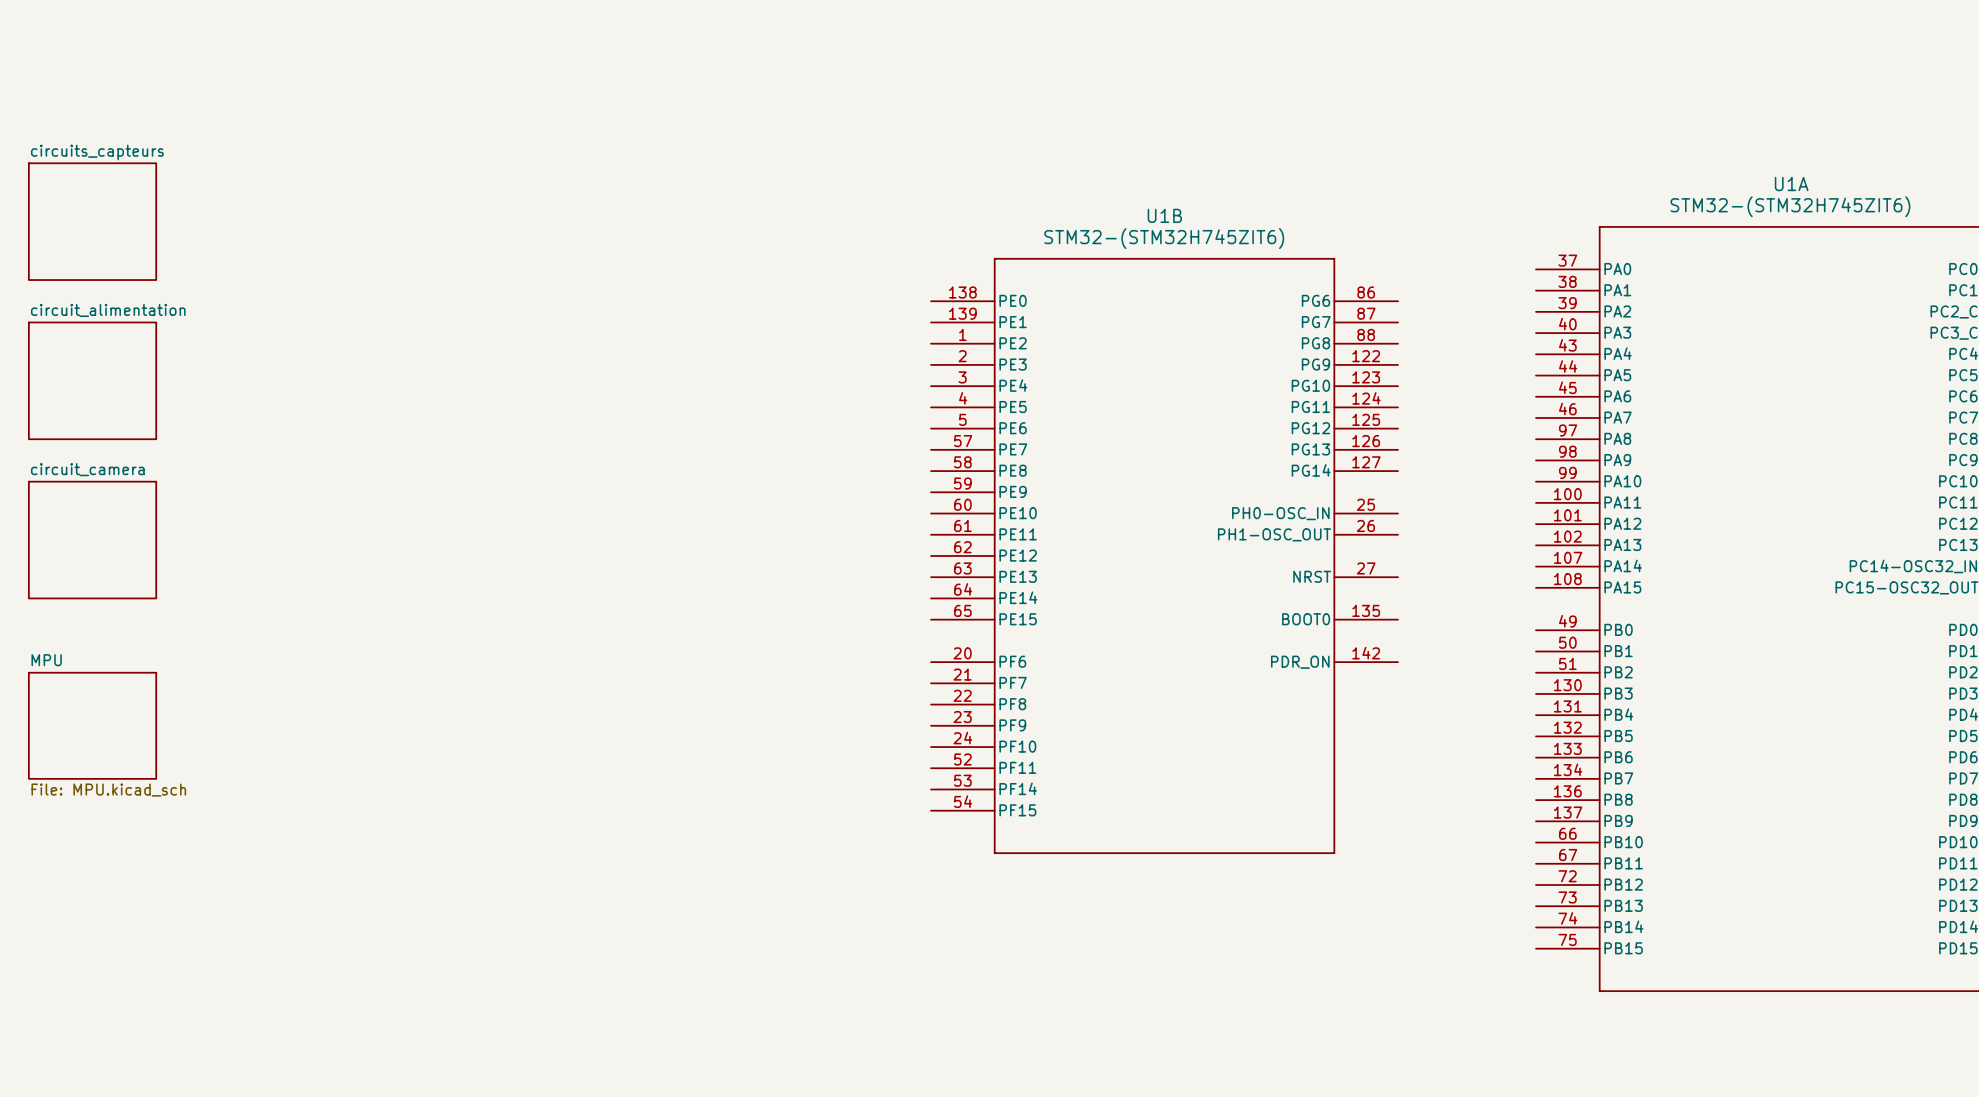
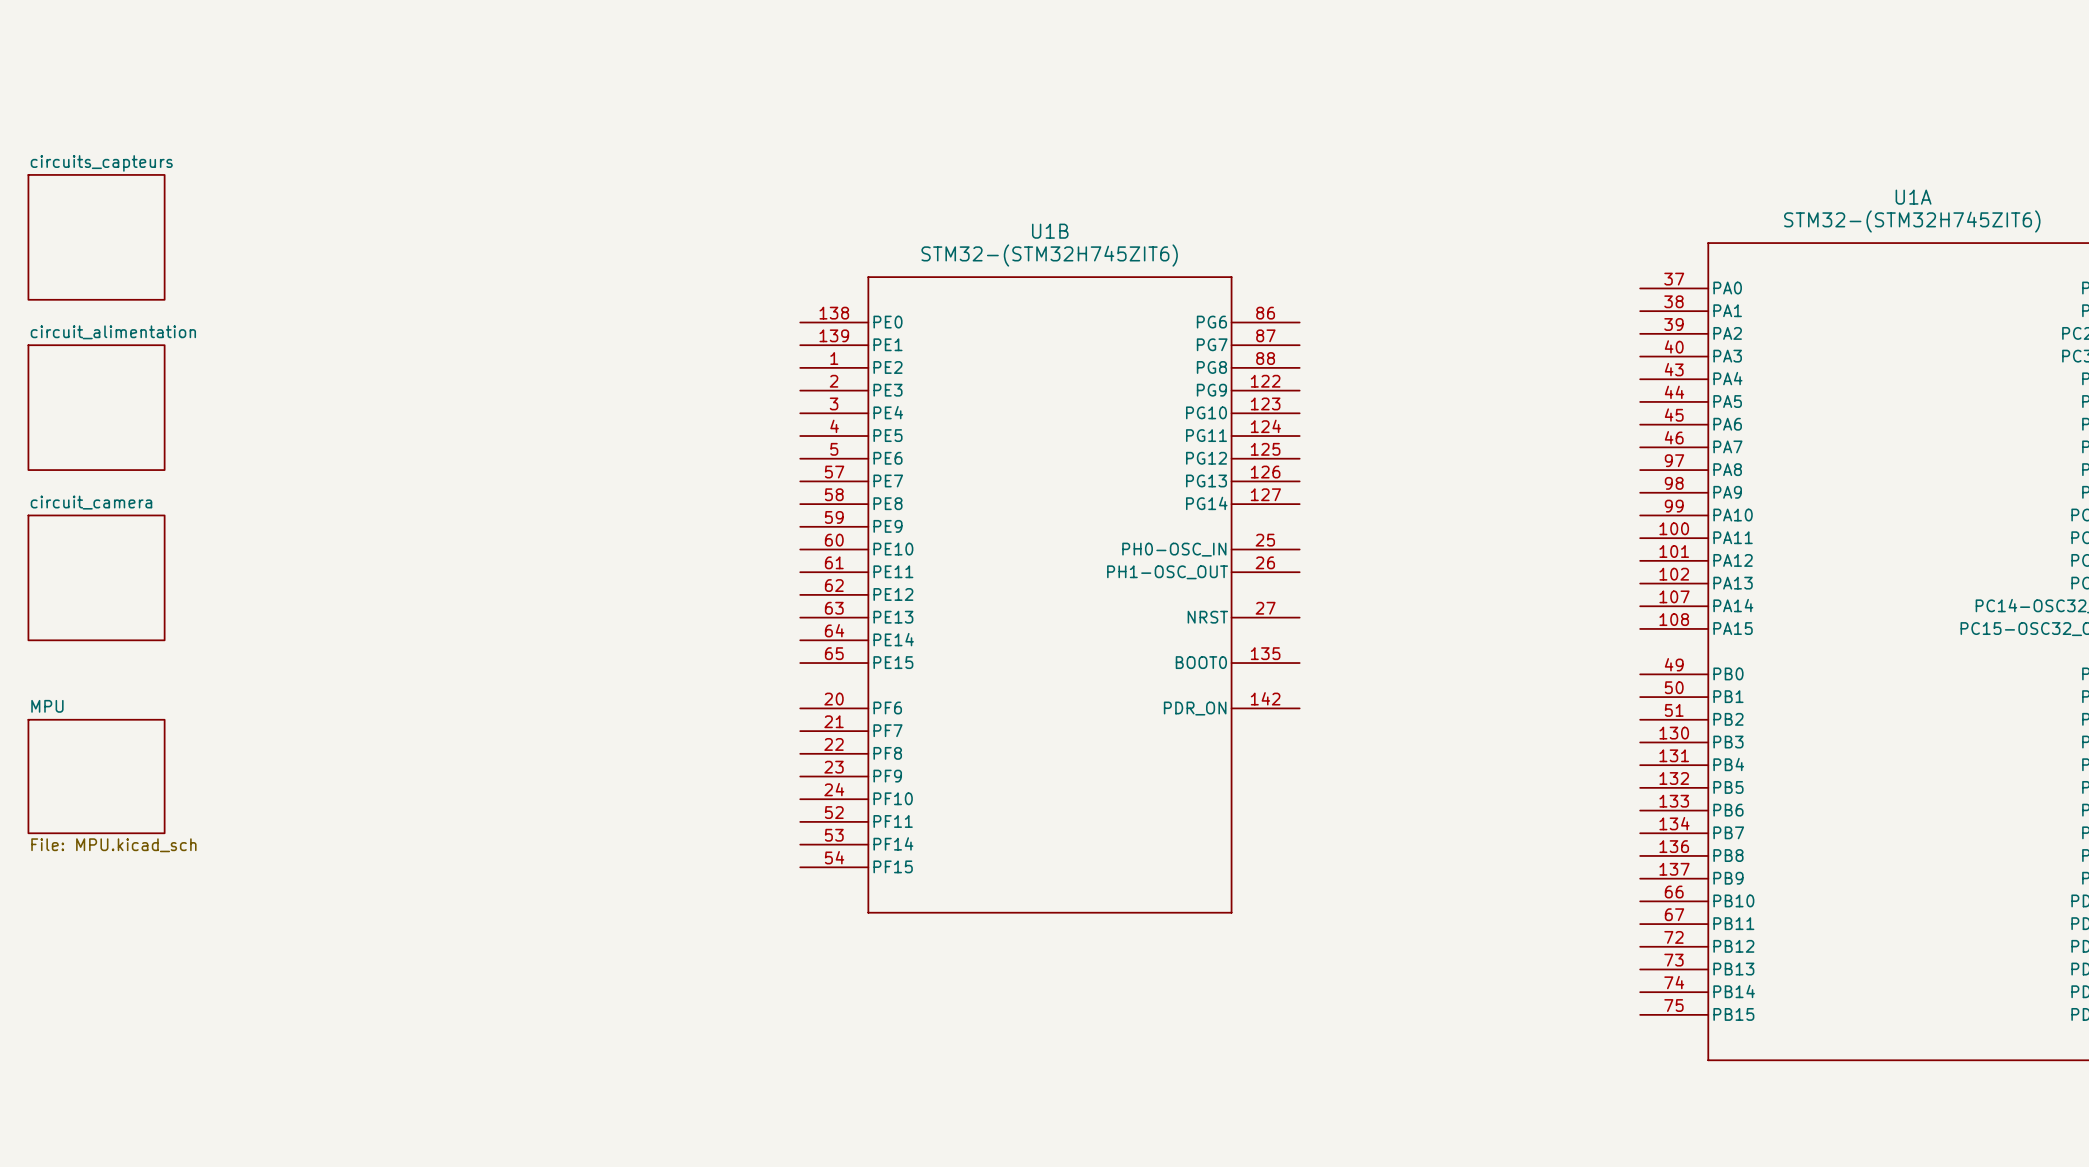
U1B position: (1164, 555) -> (1049, 594)

